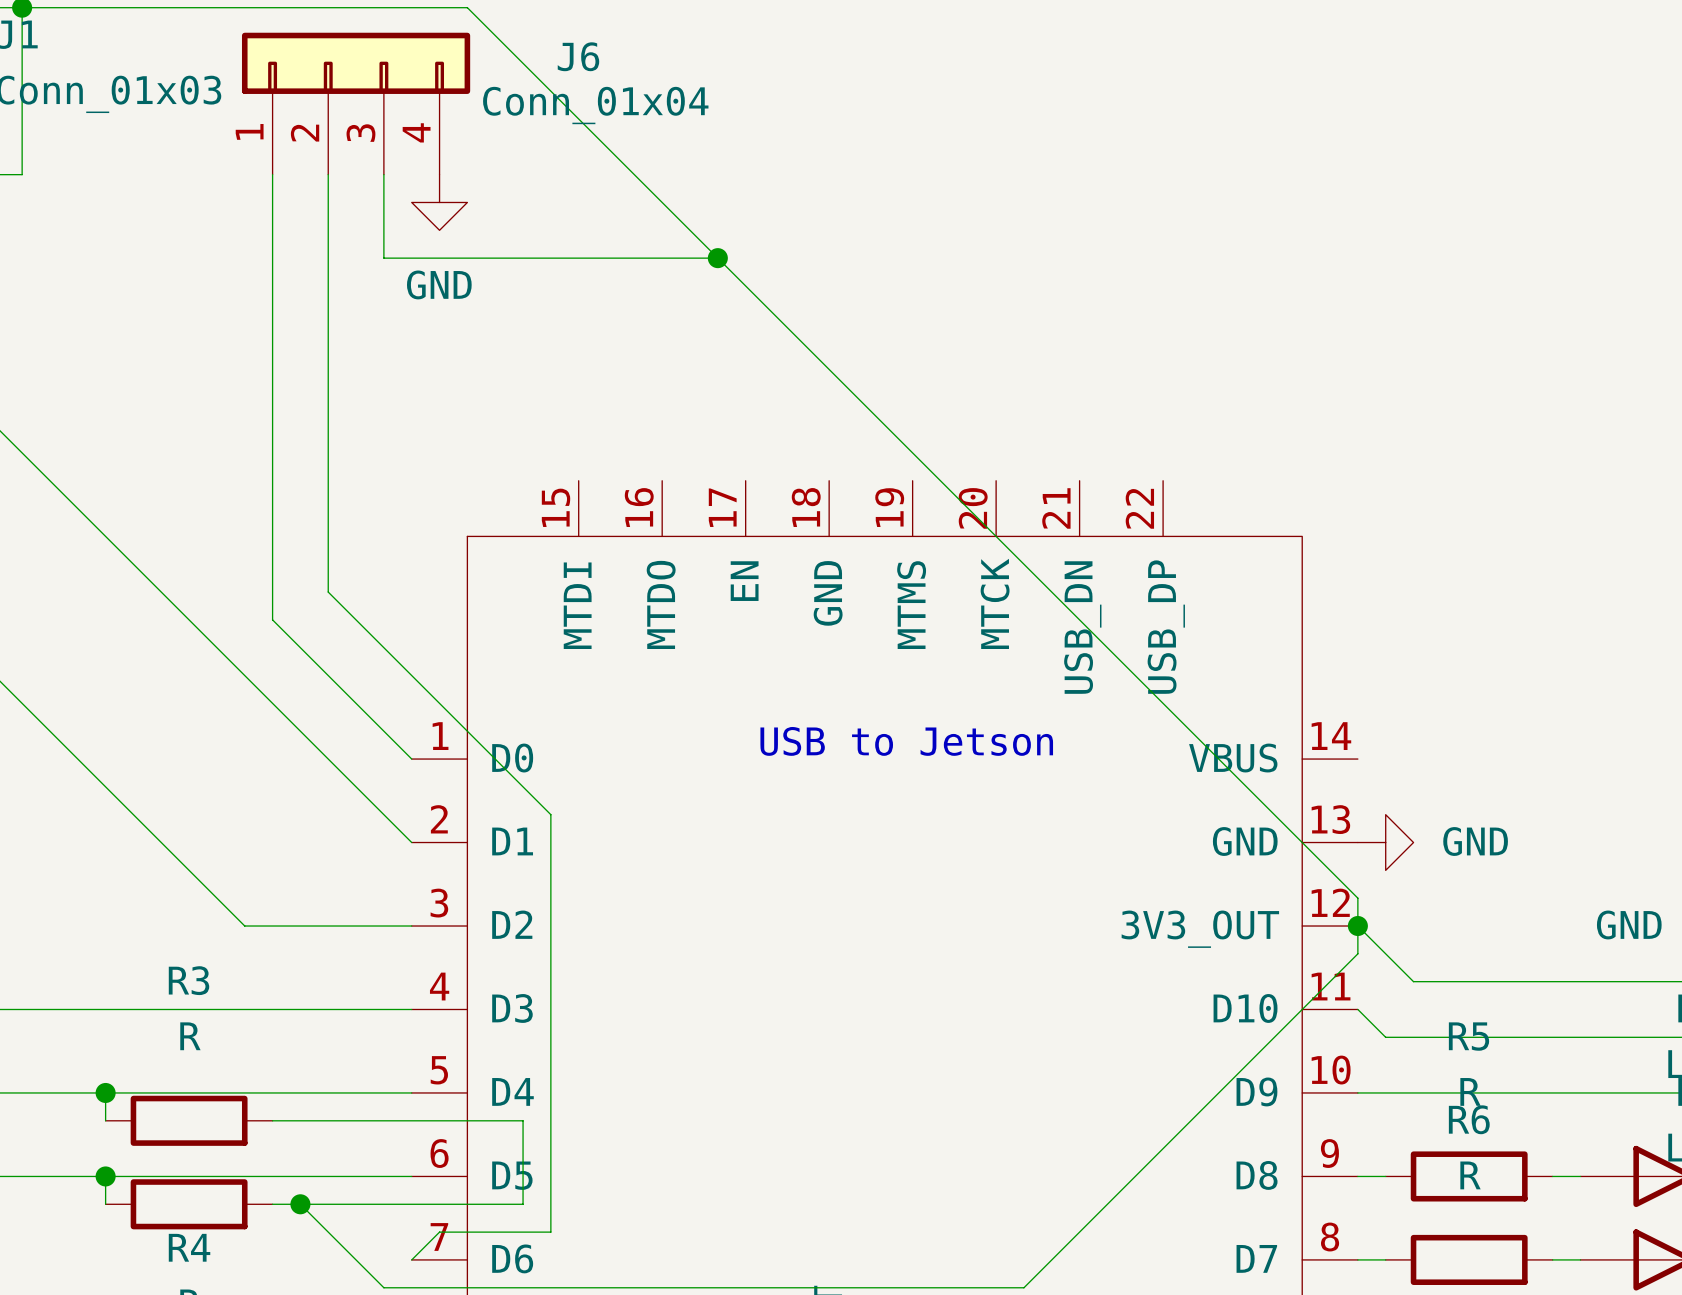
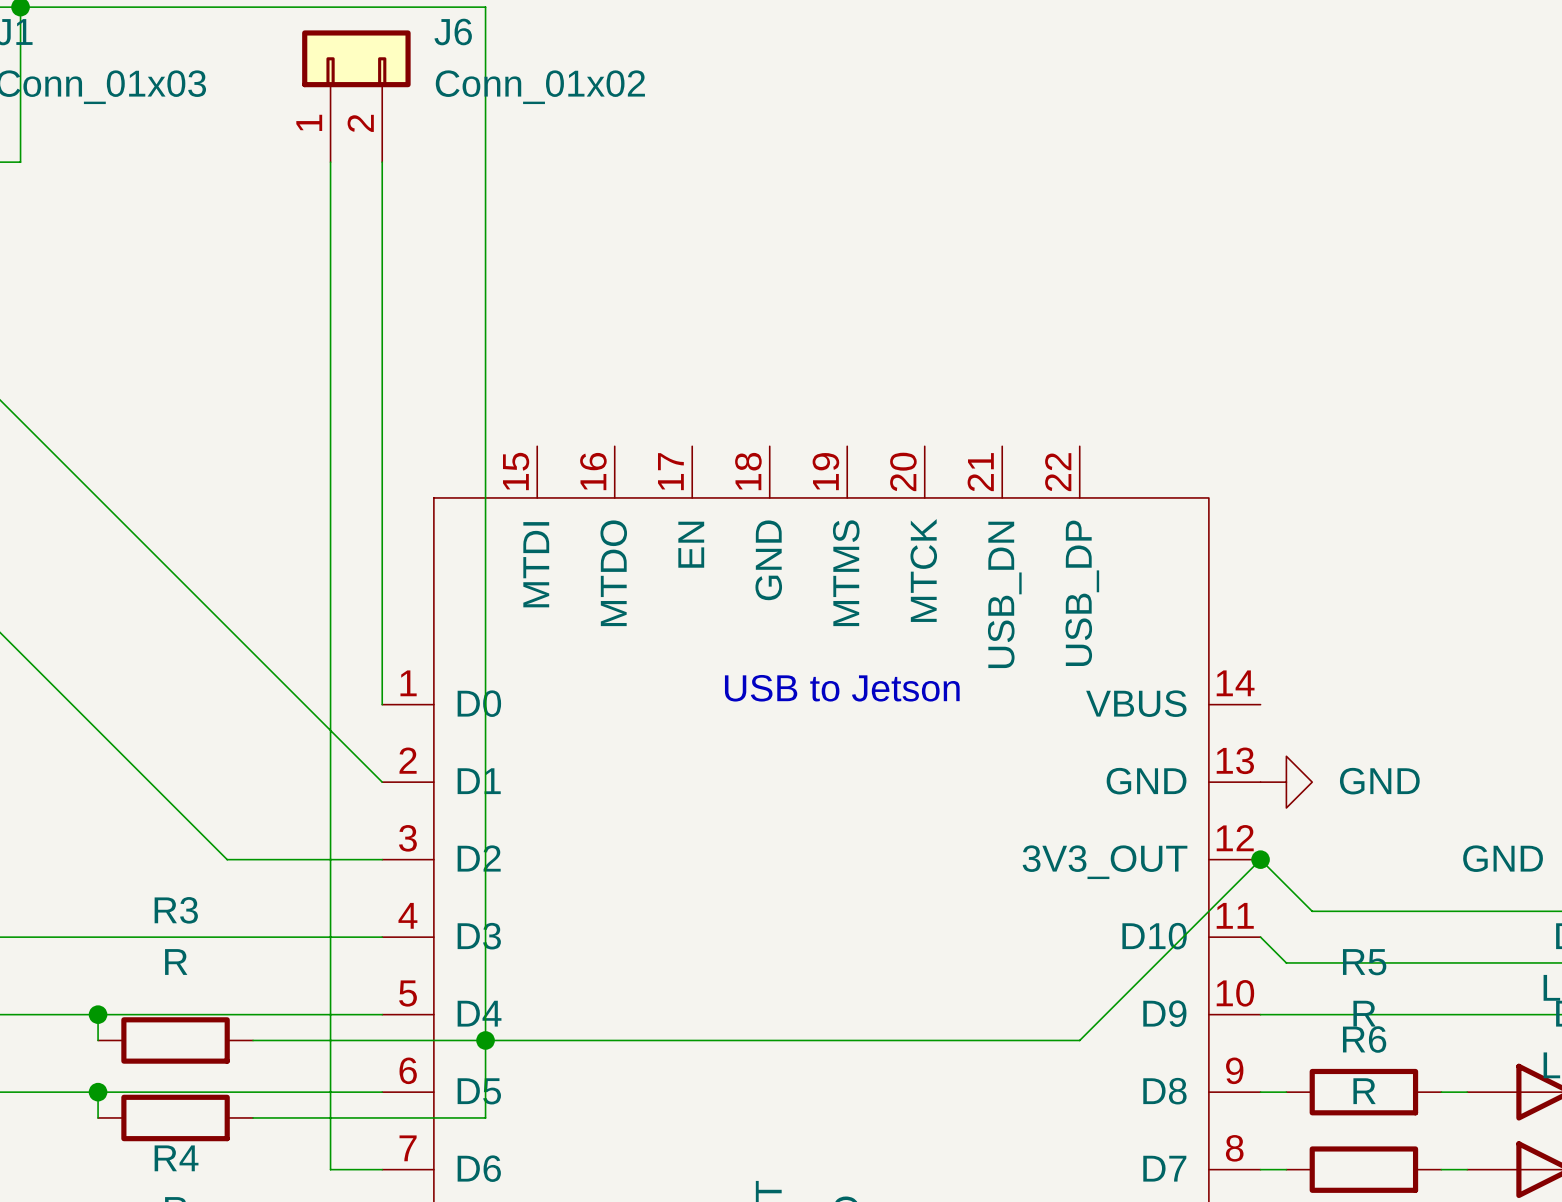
wire: (467, 7) (1357, 898) (1357, 953) (1023, 1287) (383, 1287) (300, 1204) -> (433, 7) (485, 7) (485, 1040) (1079, 1040) (1260, 859)
J6 symbol: [241, 32, 471, 175] -> [302, 30, 411, 163]
J6 name position: J6 (578, 56) -> J6 (453, 31)
J6 value: Conn_01x04 (595, 105) -> Conn_01x02 (540, 87)
wire: (272, 174) (272, 619) (411, 759) -> (382, 162) (382, 704)
wire: (328, 174) (328, 592) (550, 814) (550, 1232) (439, 1232) (411, 1259) -> (330, 162) (330, 1169) (382, 1169)
wire: (383, 174) (383, 258) (717, 258) -> none
power symbol: GND (439, 202) -> none
junction: (717, 258) -> none
junction: none -> (485, 1040)
junction: (300, 1204) -> none

